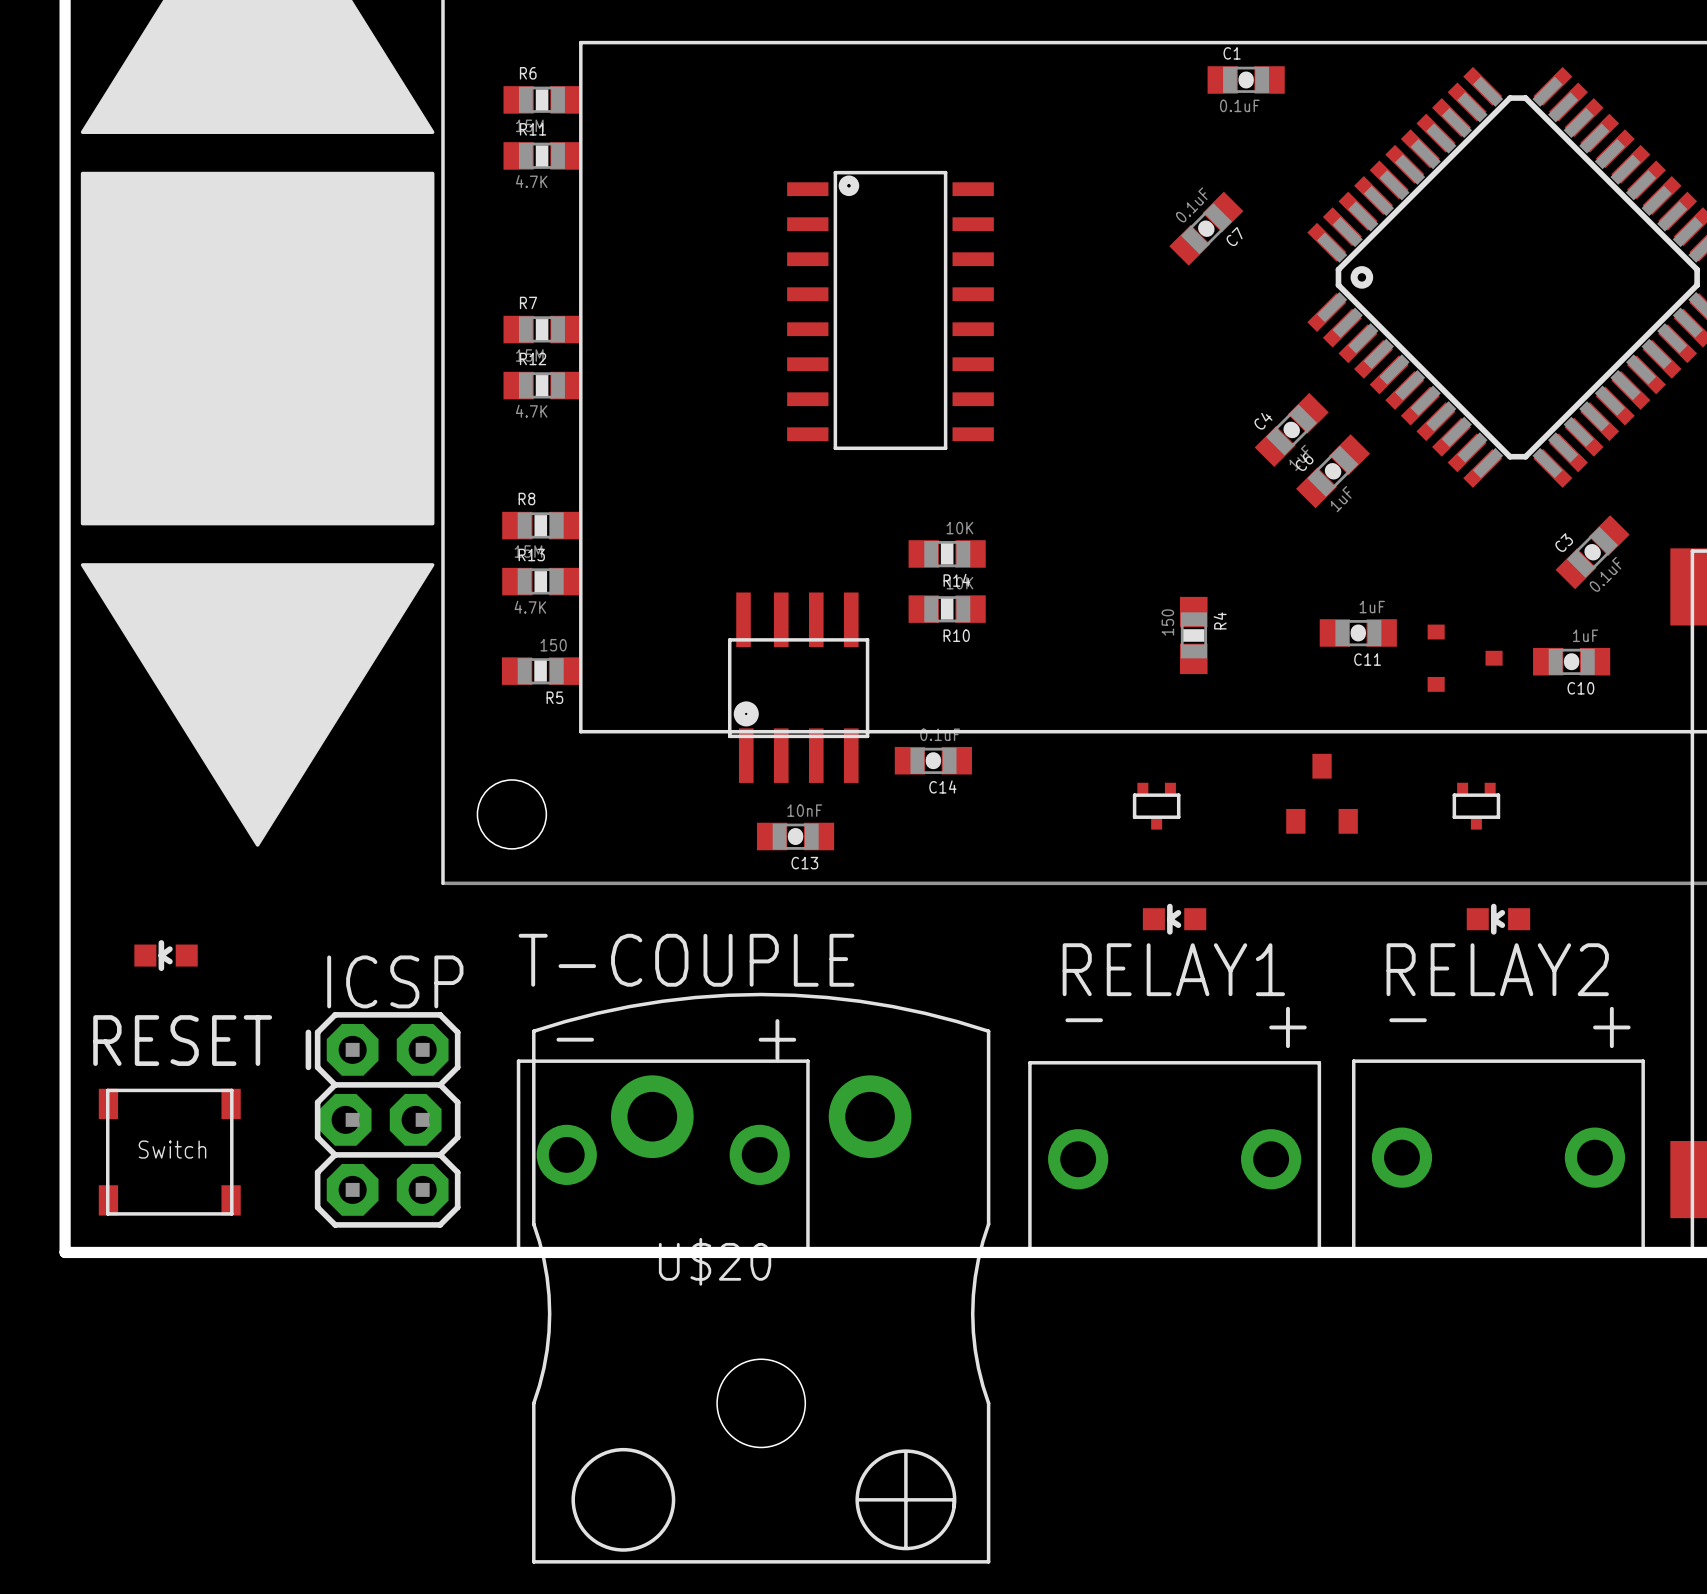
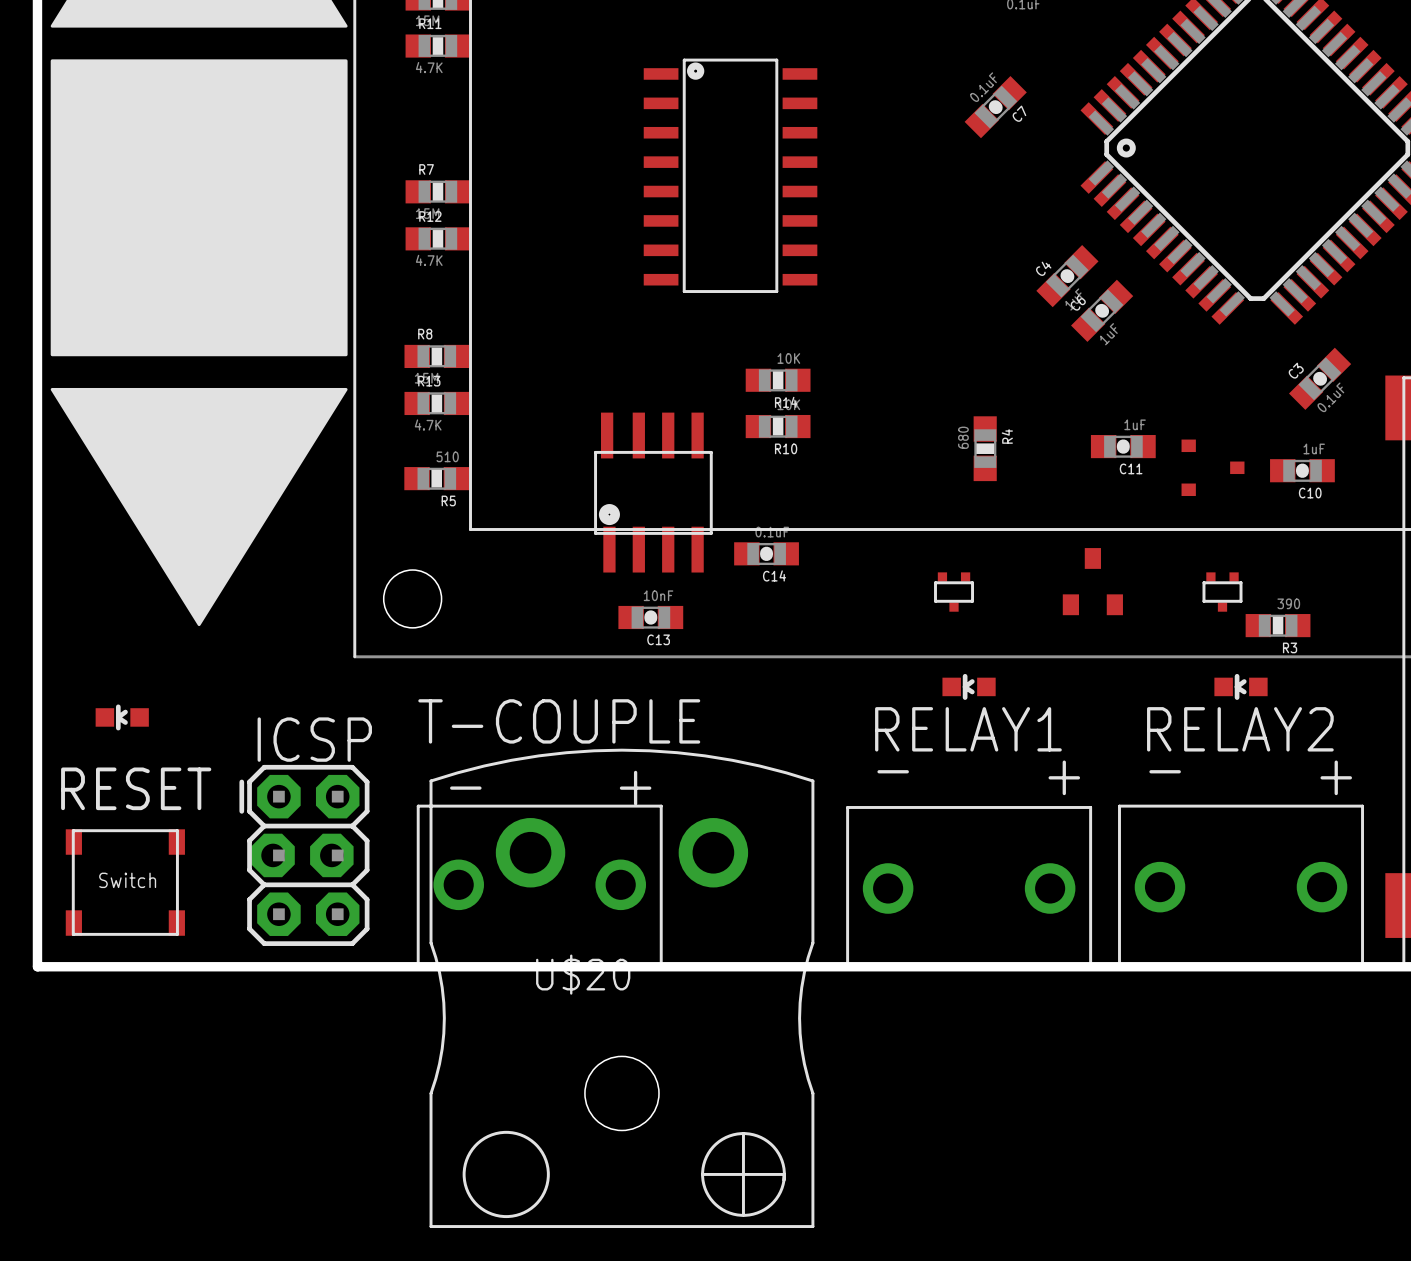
R4 value: 150 (1167, 622) -> 680 (963, 437)
R5 value: 150 (553, 645) -> 510 (447, 456)
R3: none -> 390 (1278, 625)

